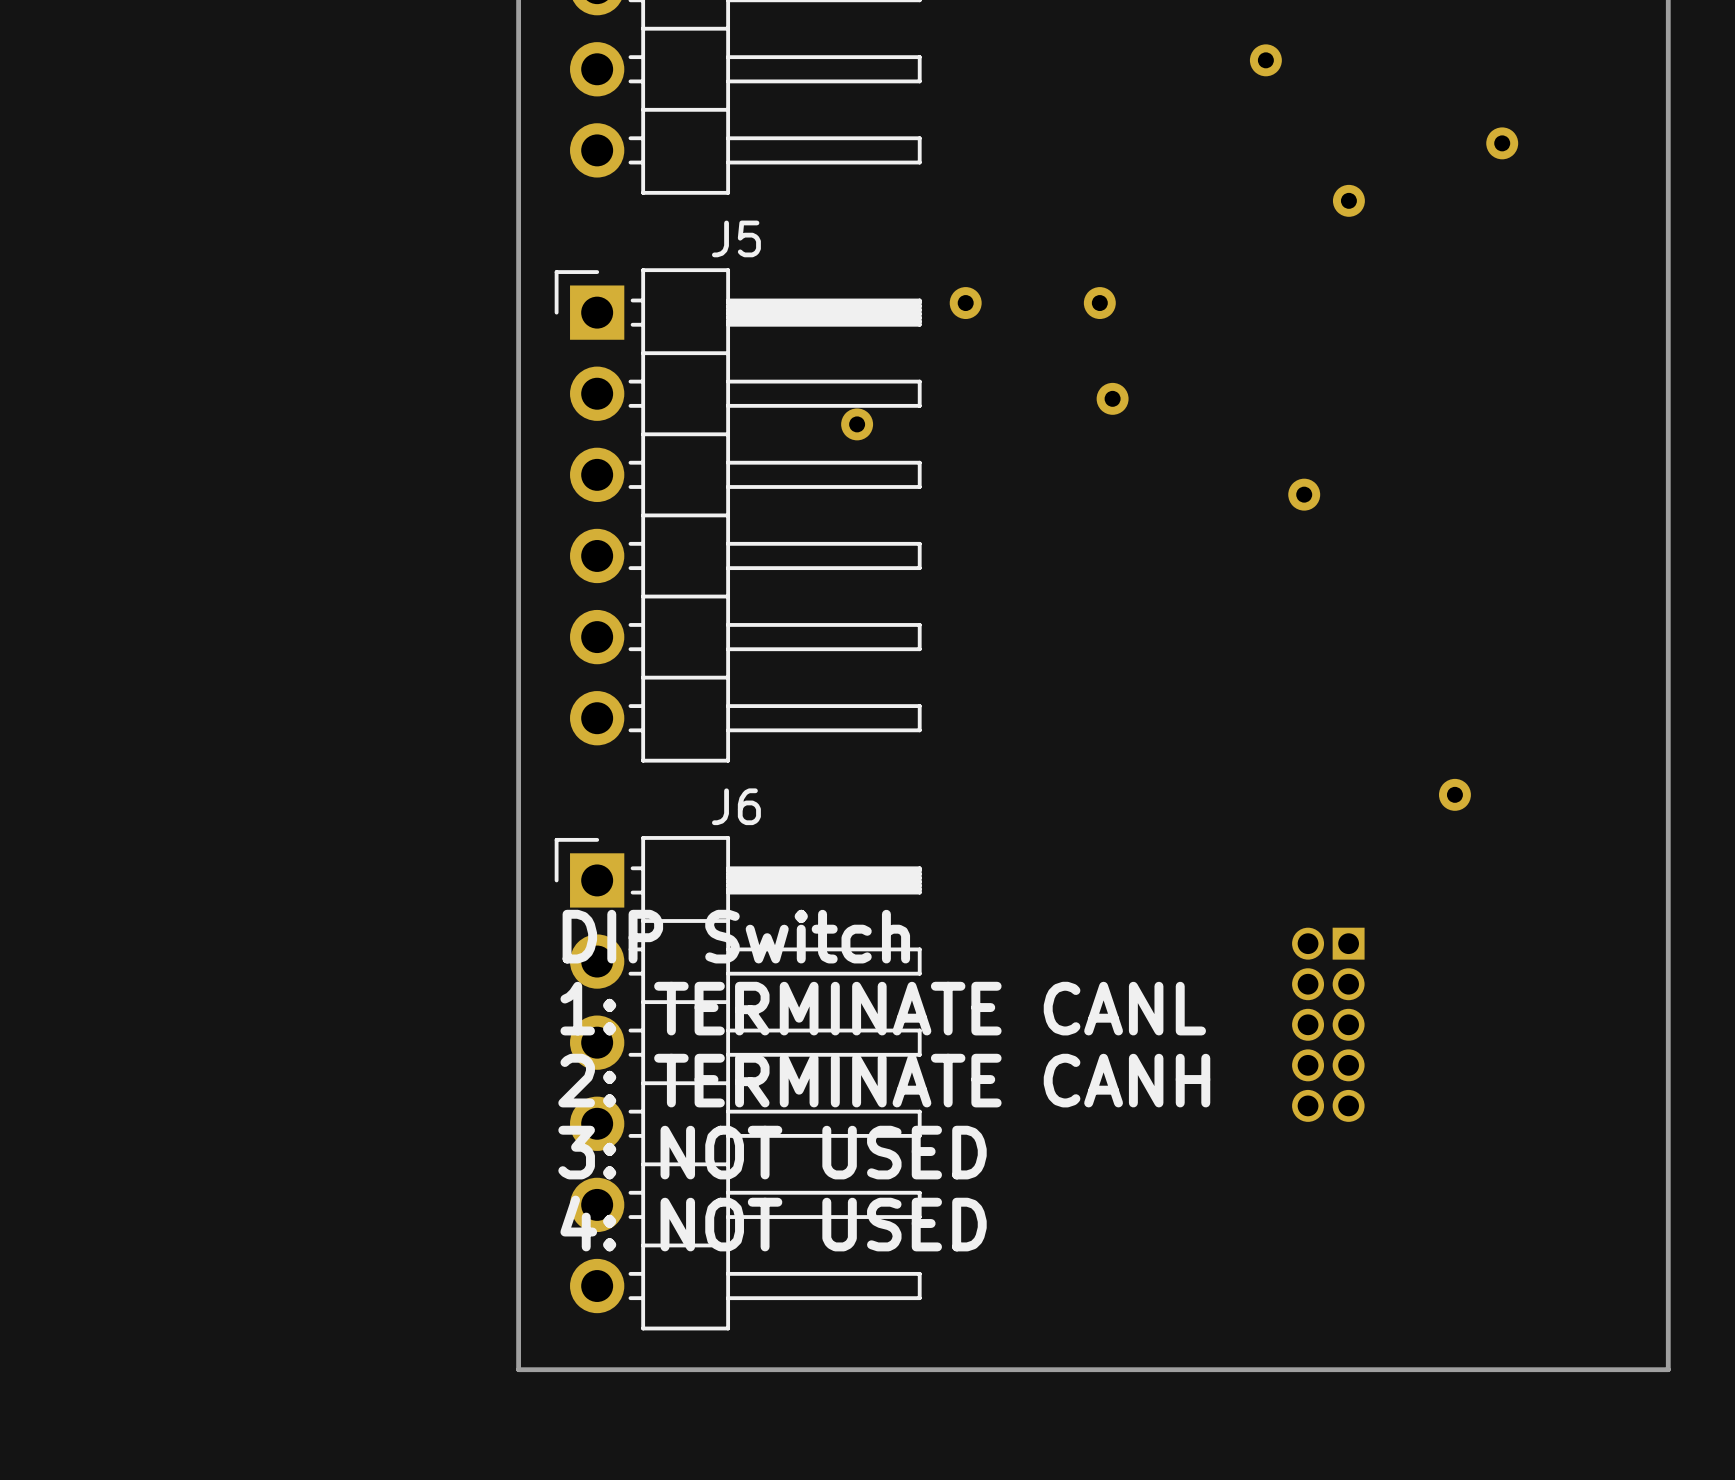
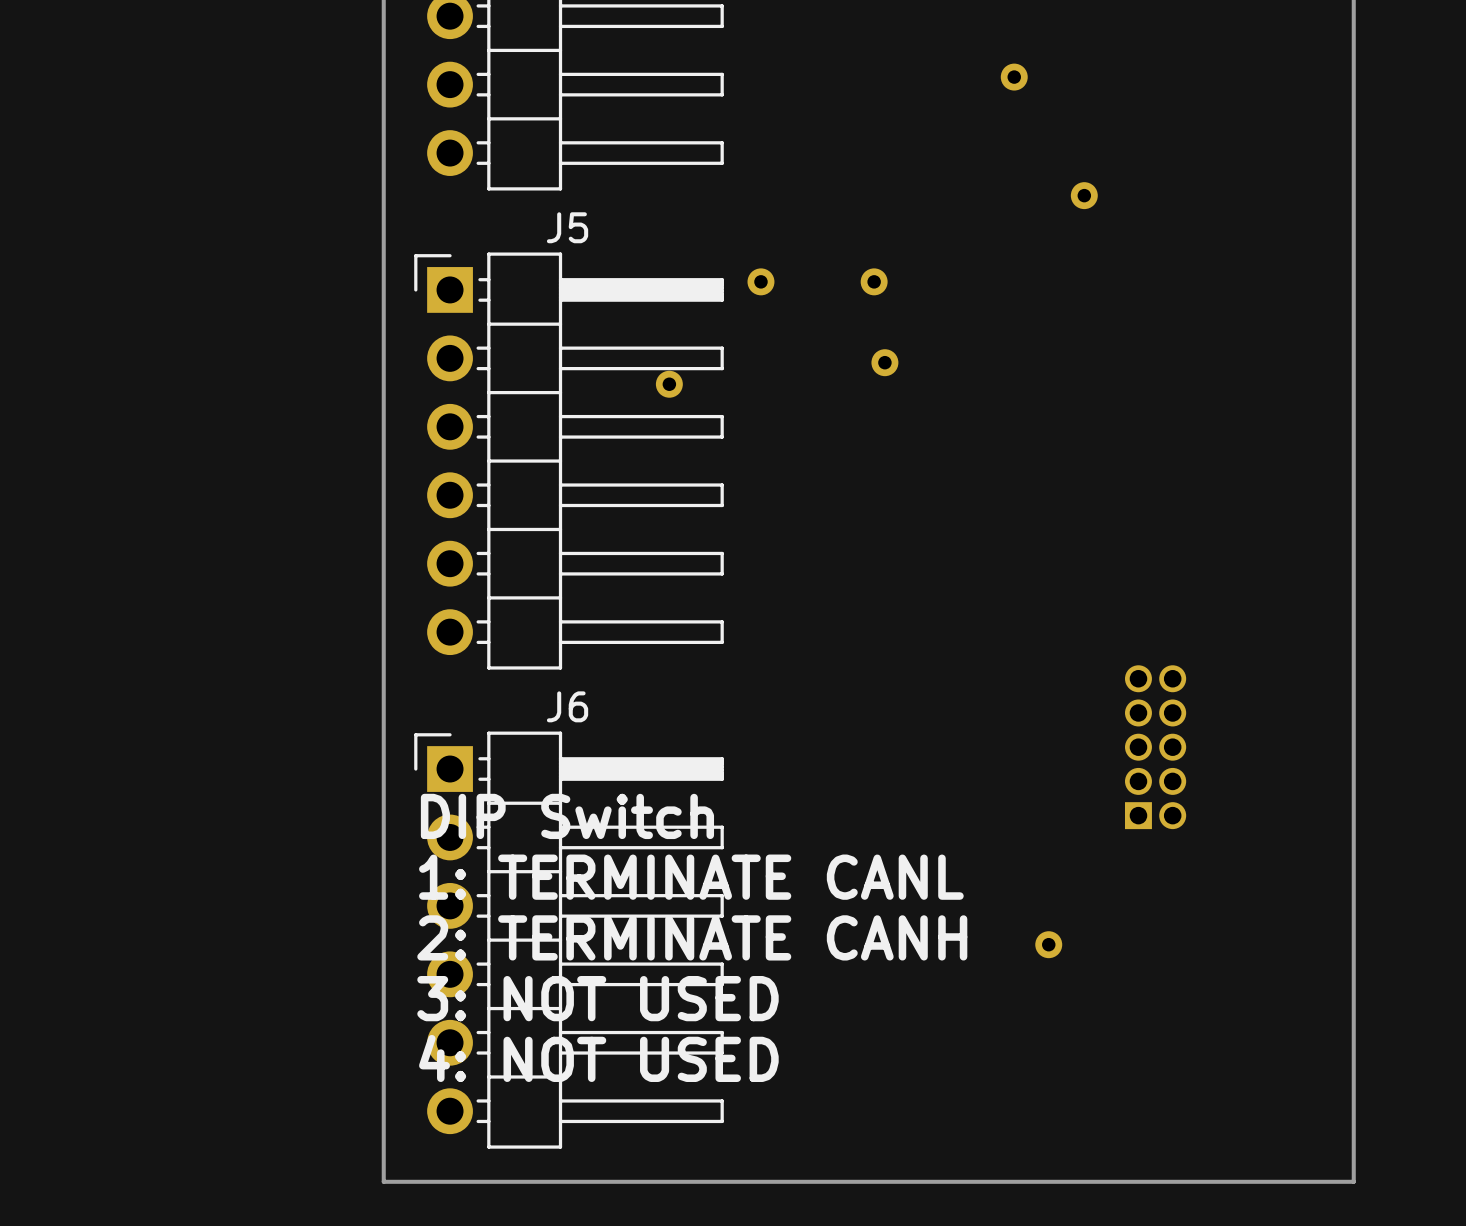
part: (1502, 143) -> none
part: (1304, 494) -> none
part: (1454, 794) -> none
part rotation: 0° (1328, 1024) -> 180° (1155, 747)
part position: (1328, 1024) -> (1155, 747)
part: none -> (1048, 944)

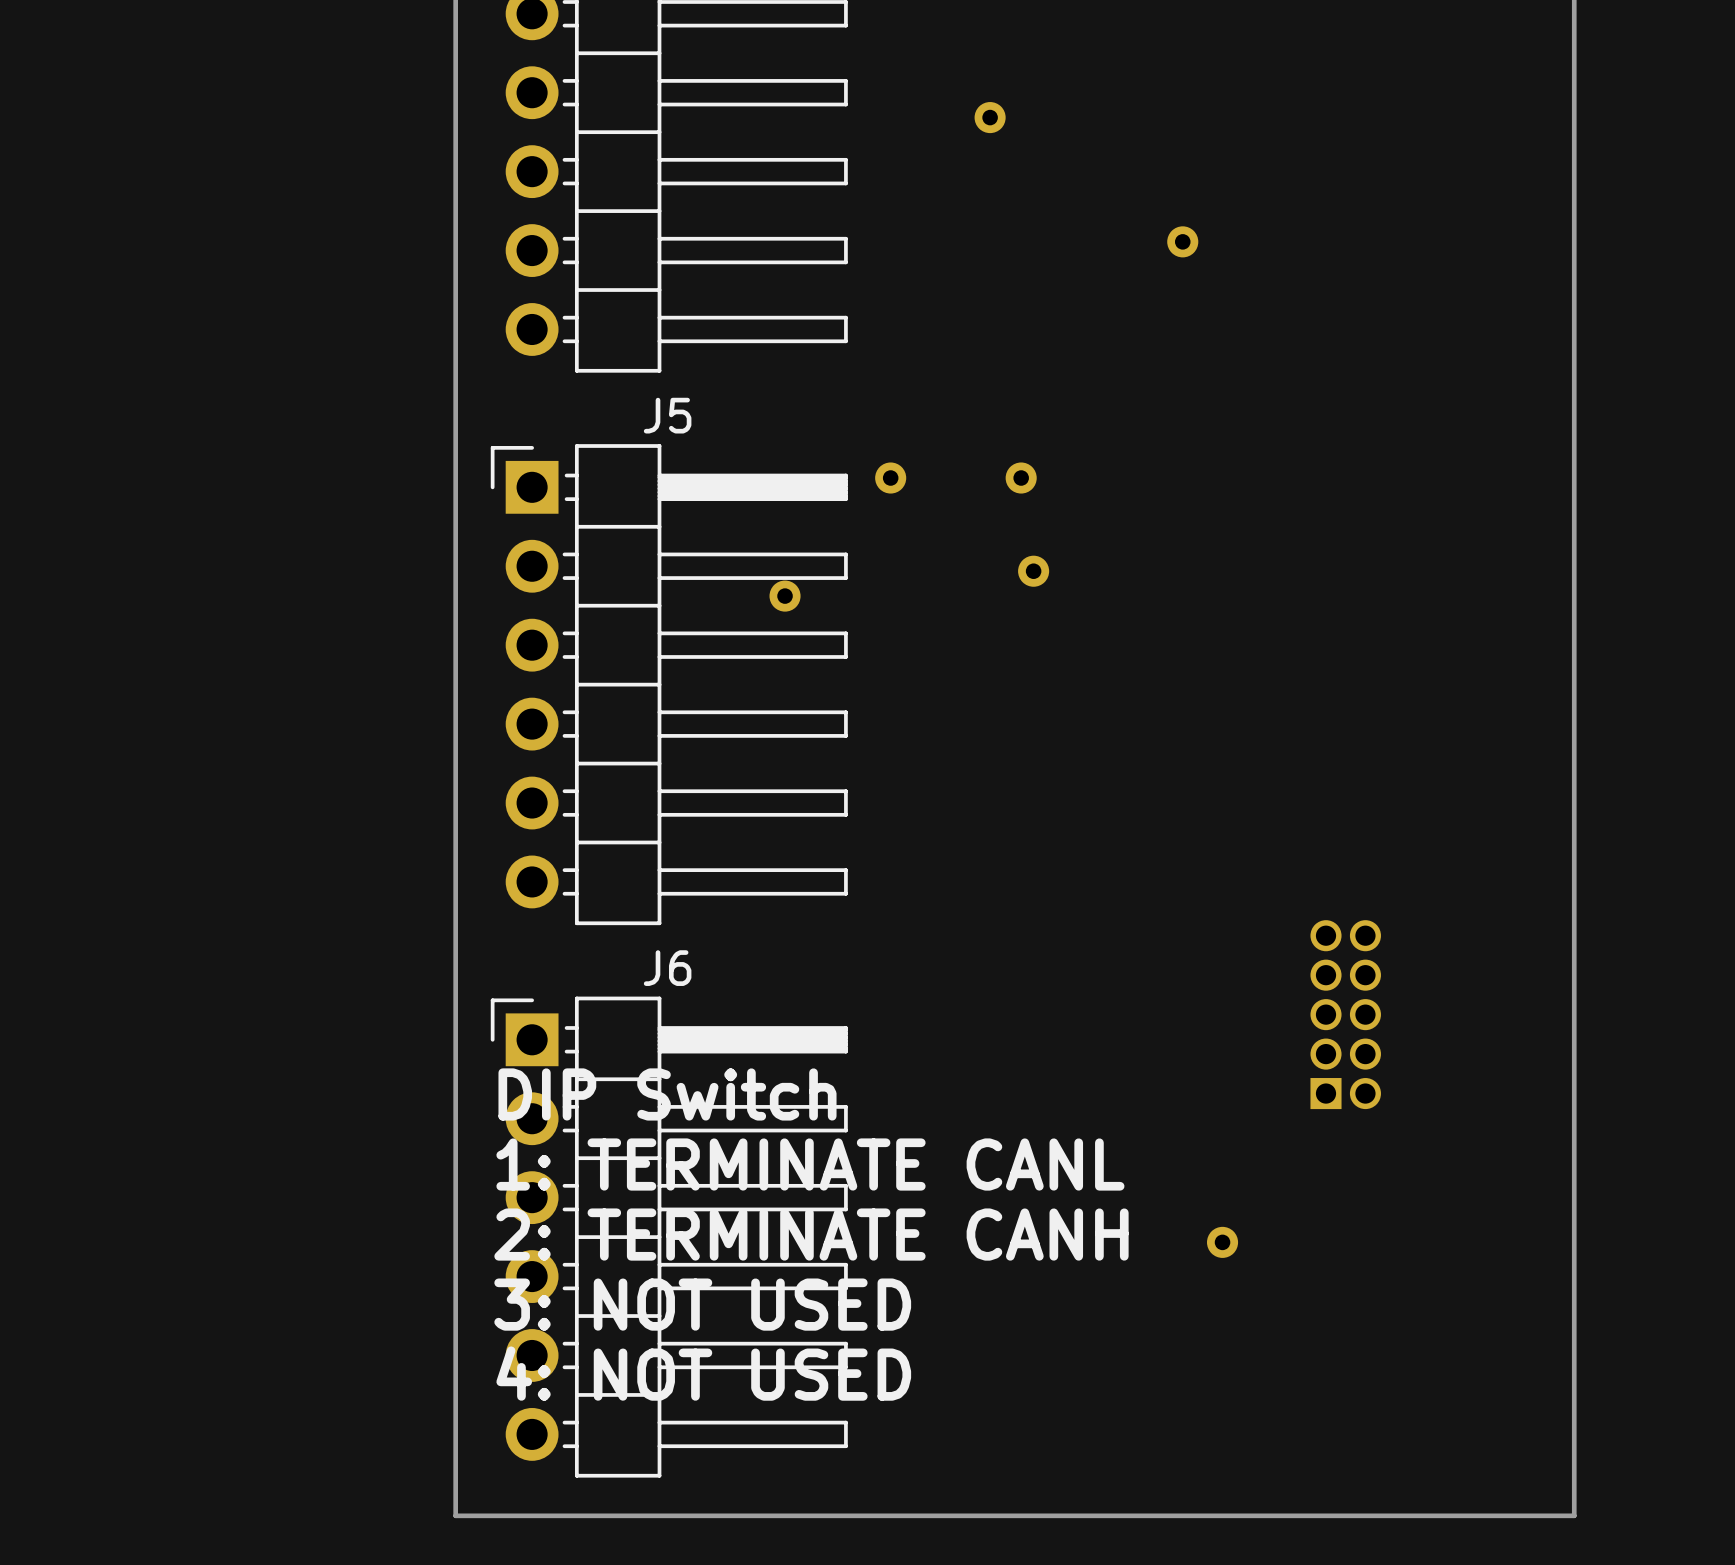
part: (1084, 195) -> none

